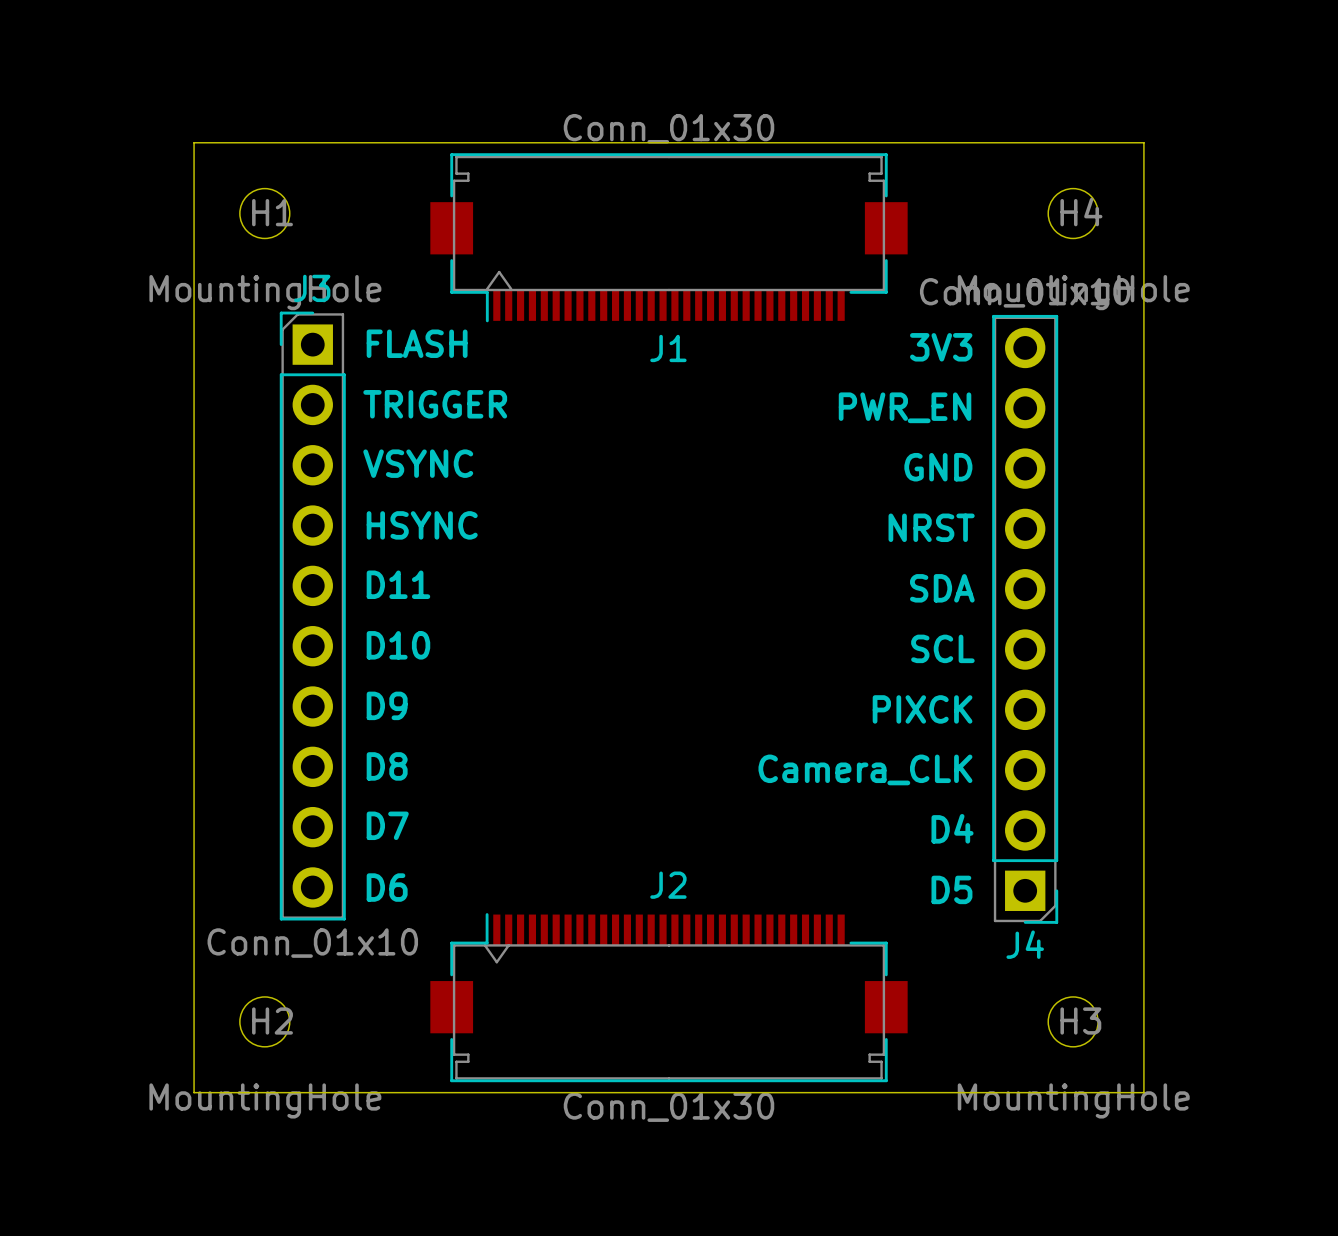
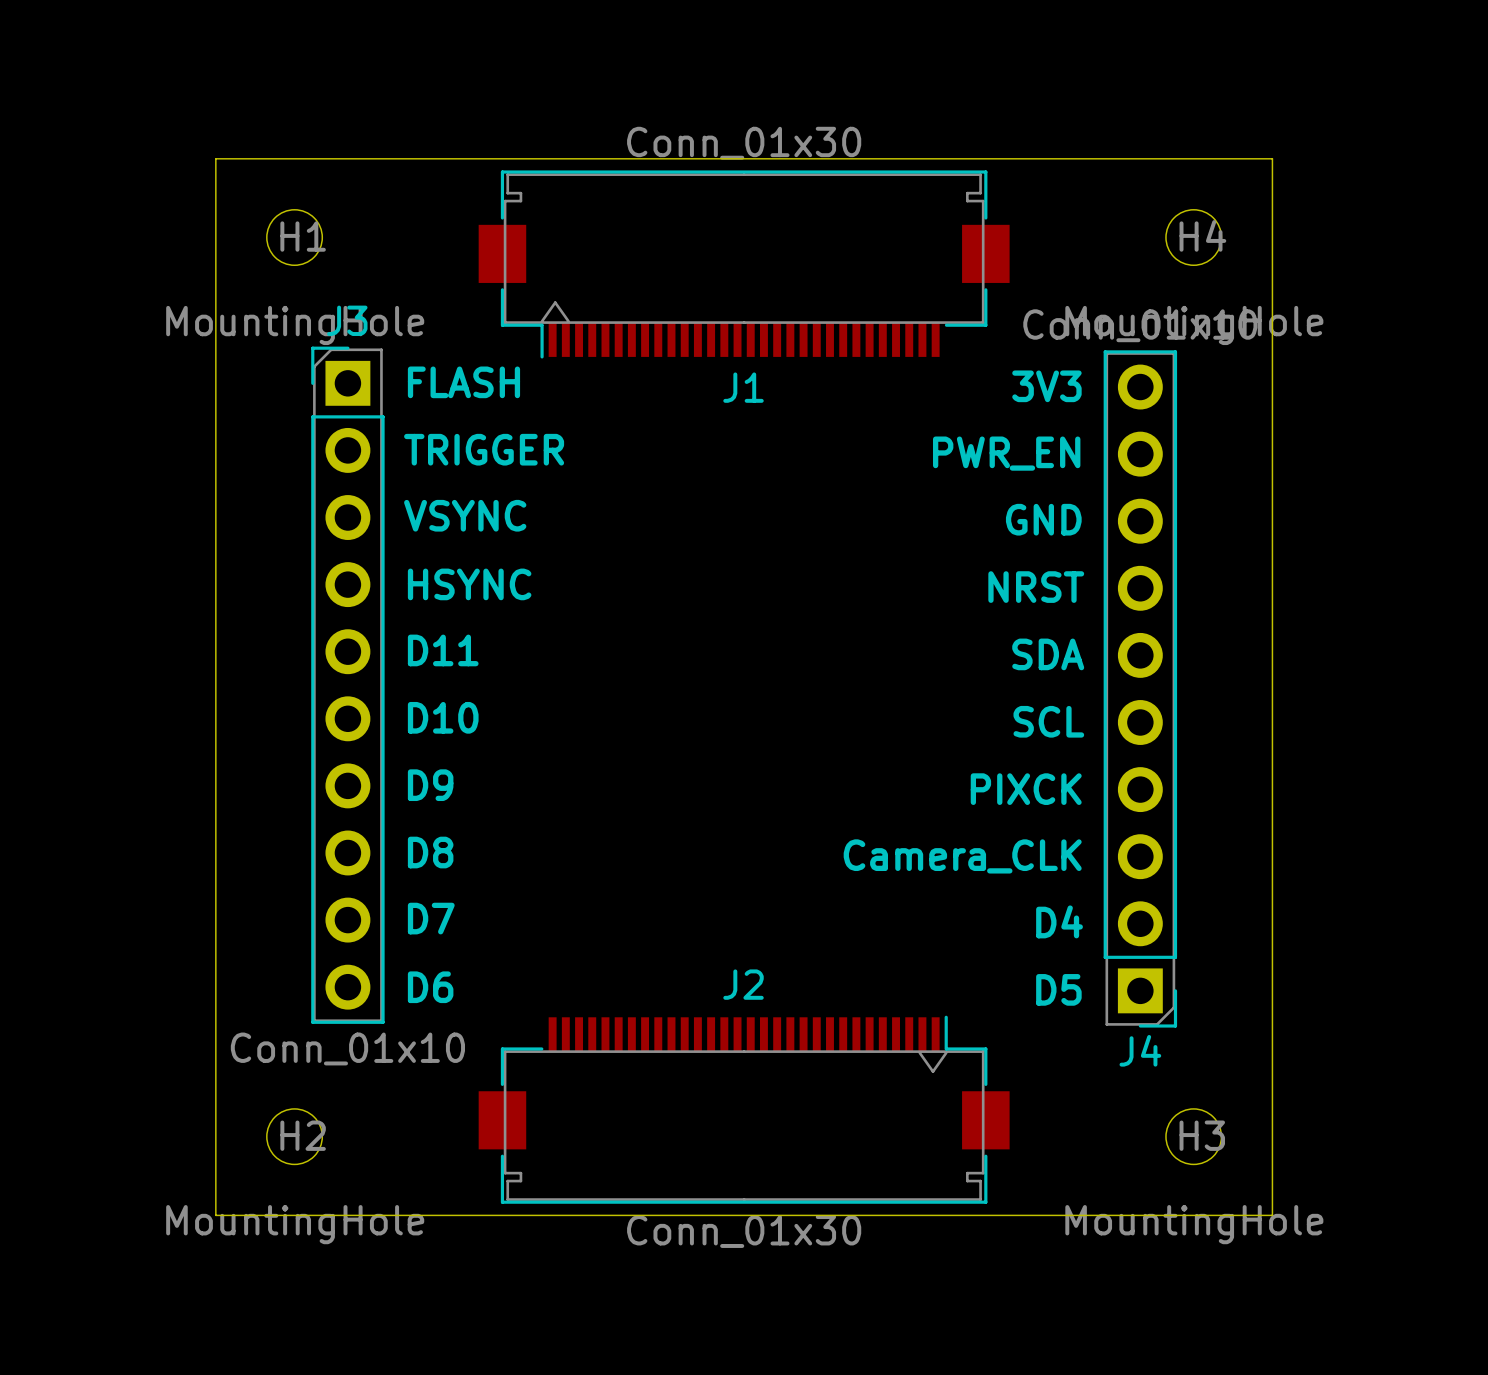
J2 footprint: [430, 913, 908, 1083] -> [478, 1015, 1010, 1204]

